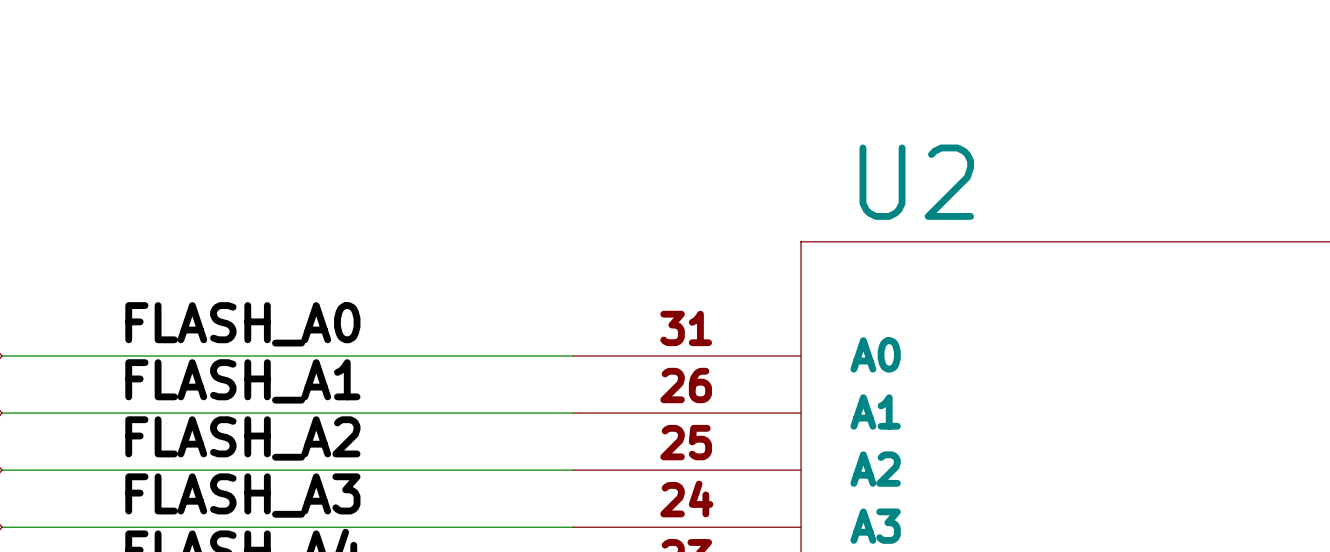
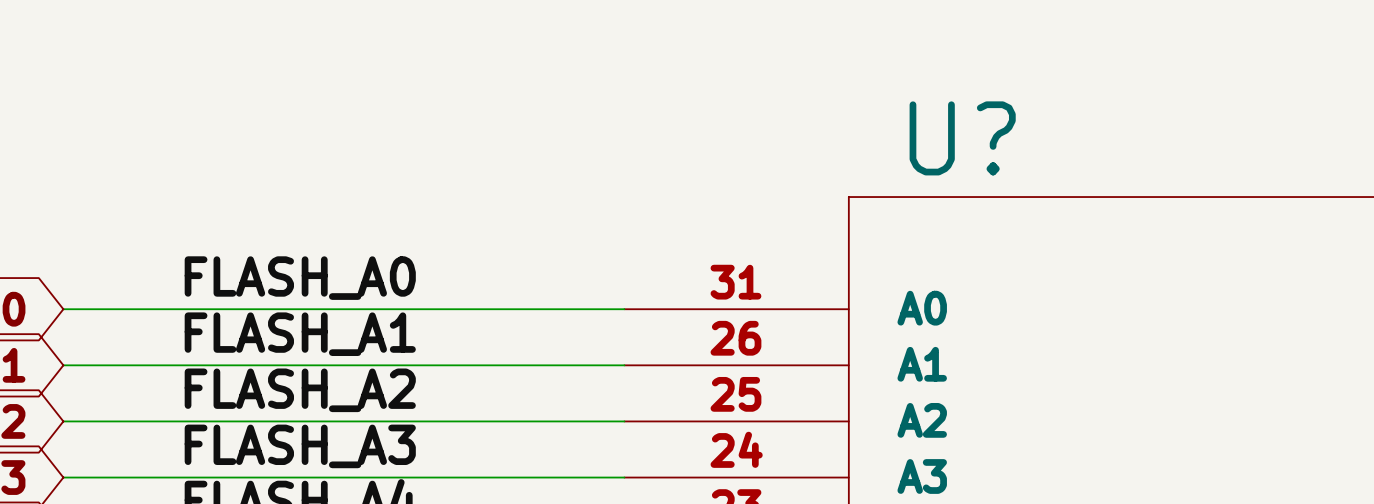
U2 name: U2 (916, 182) -> U? (962, 138)

